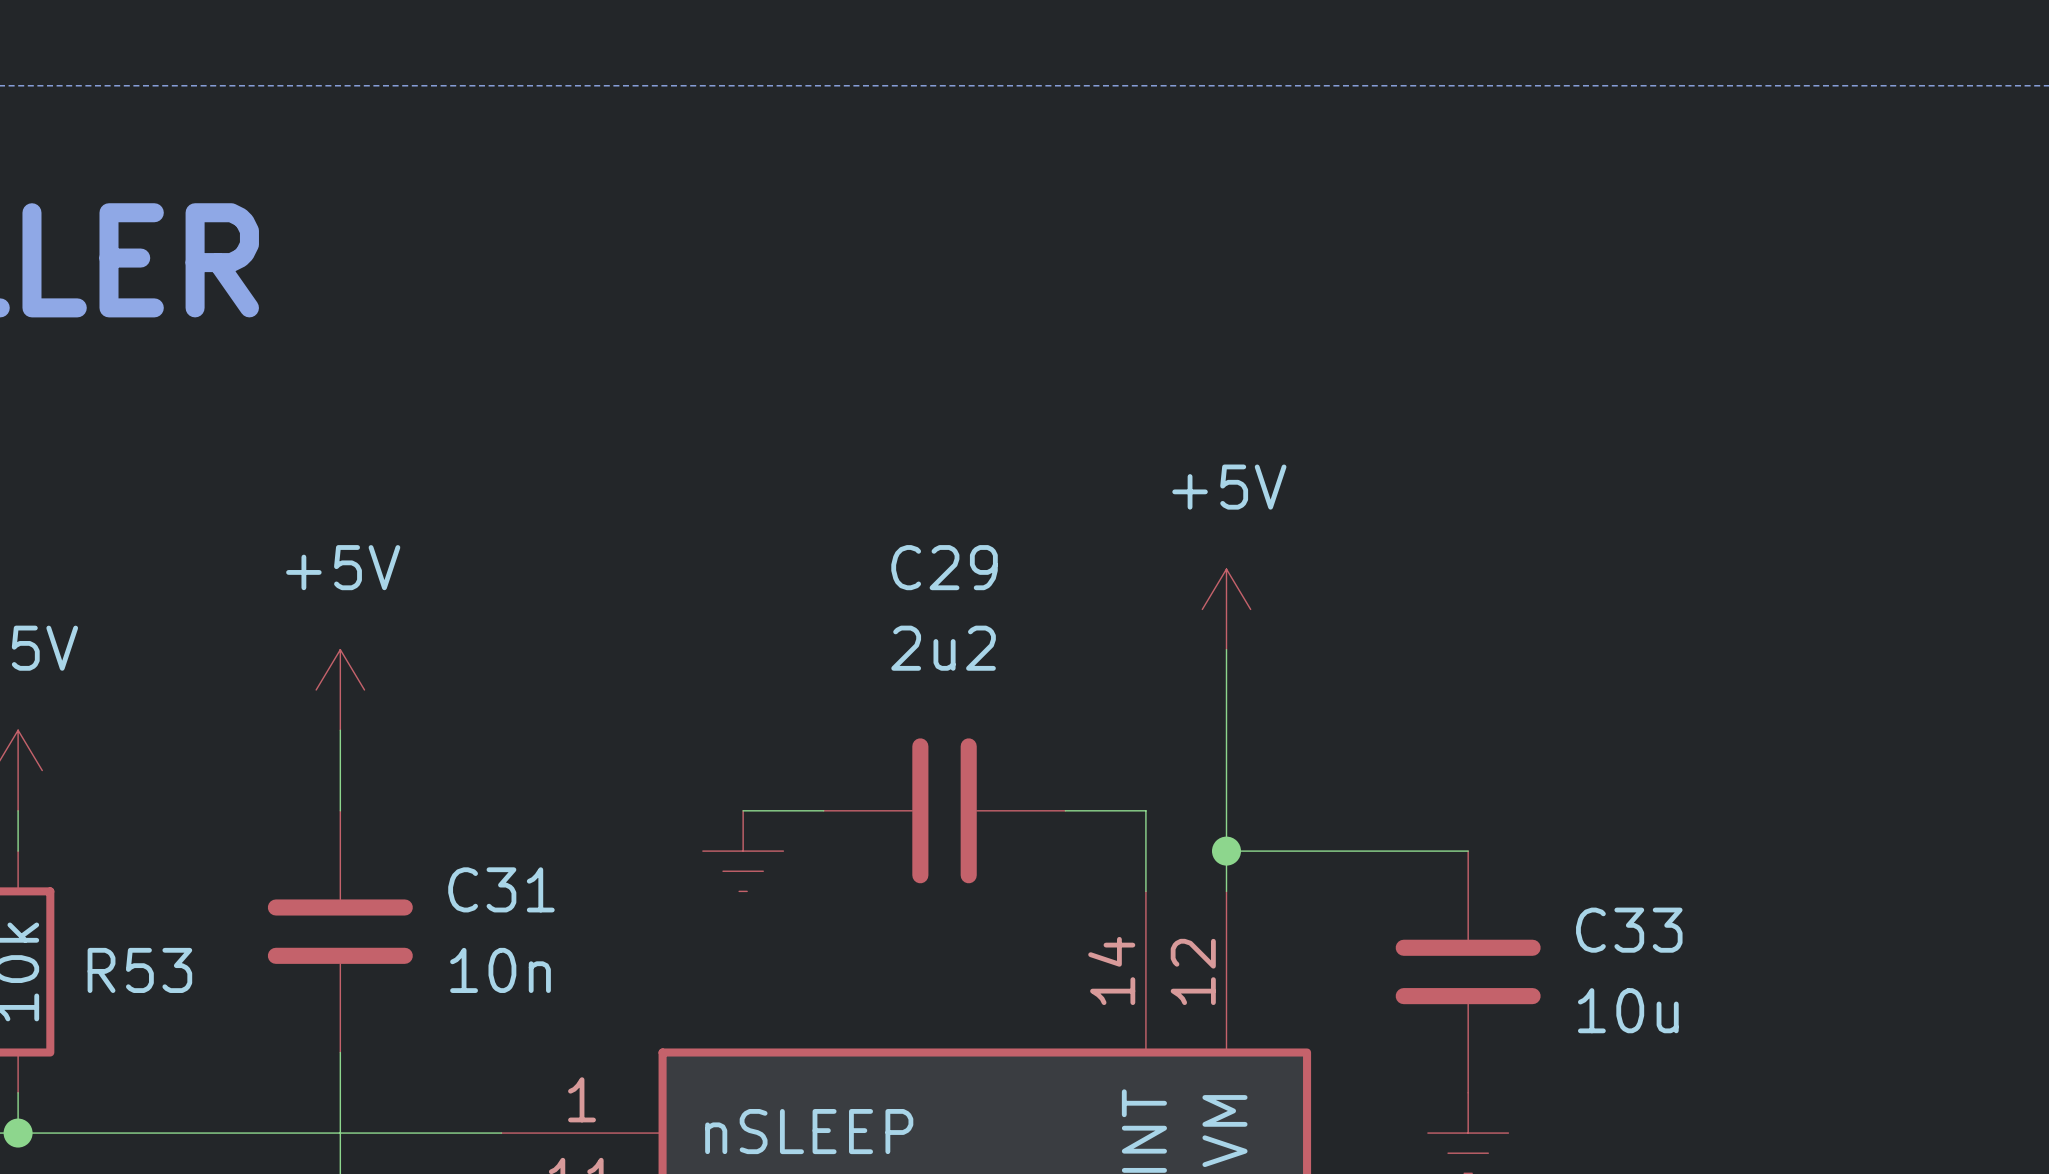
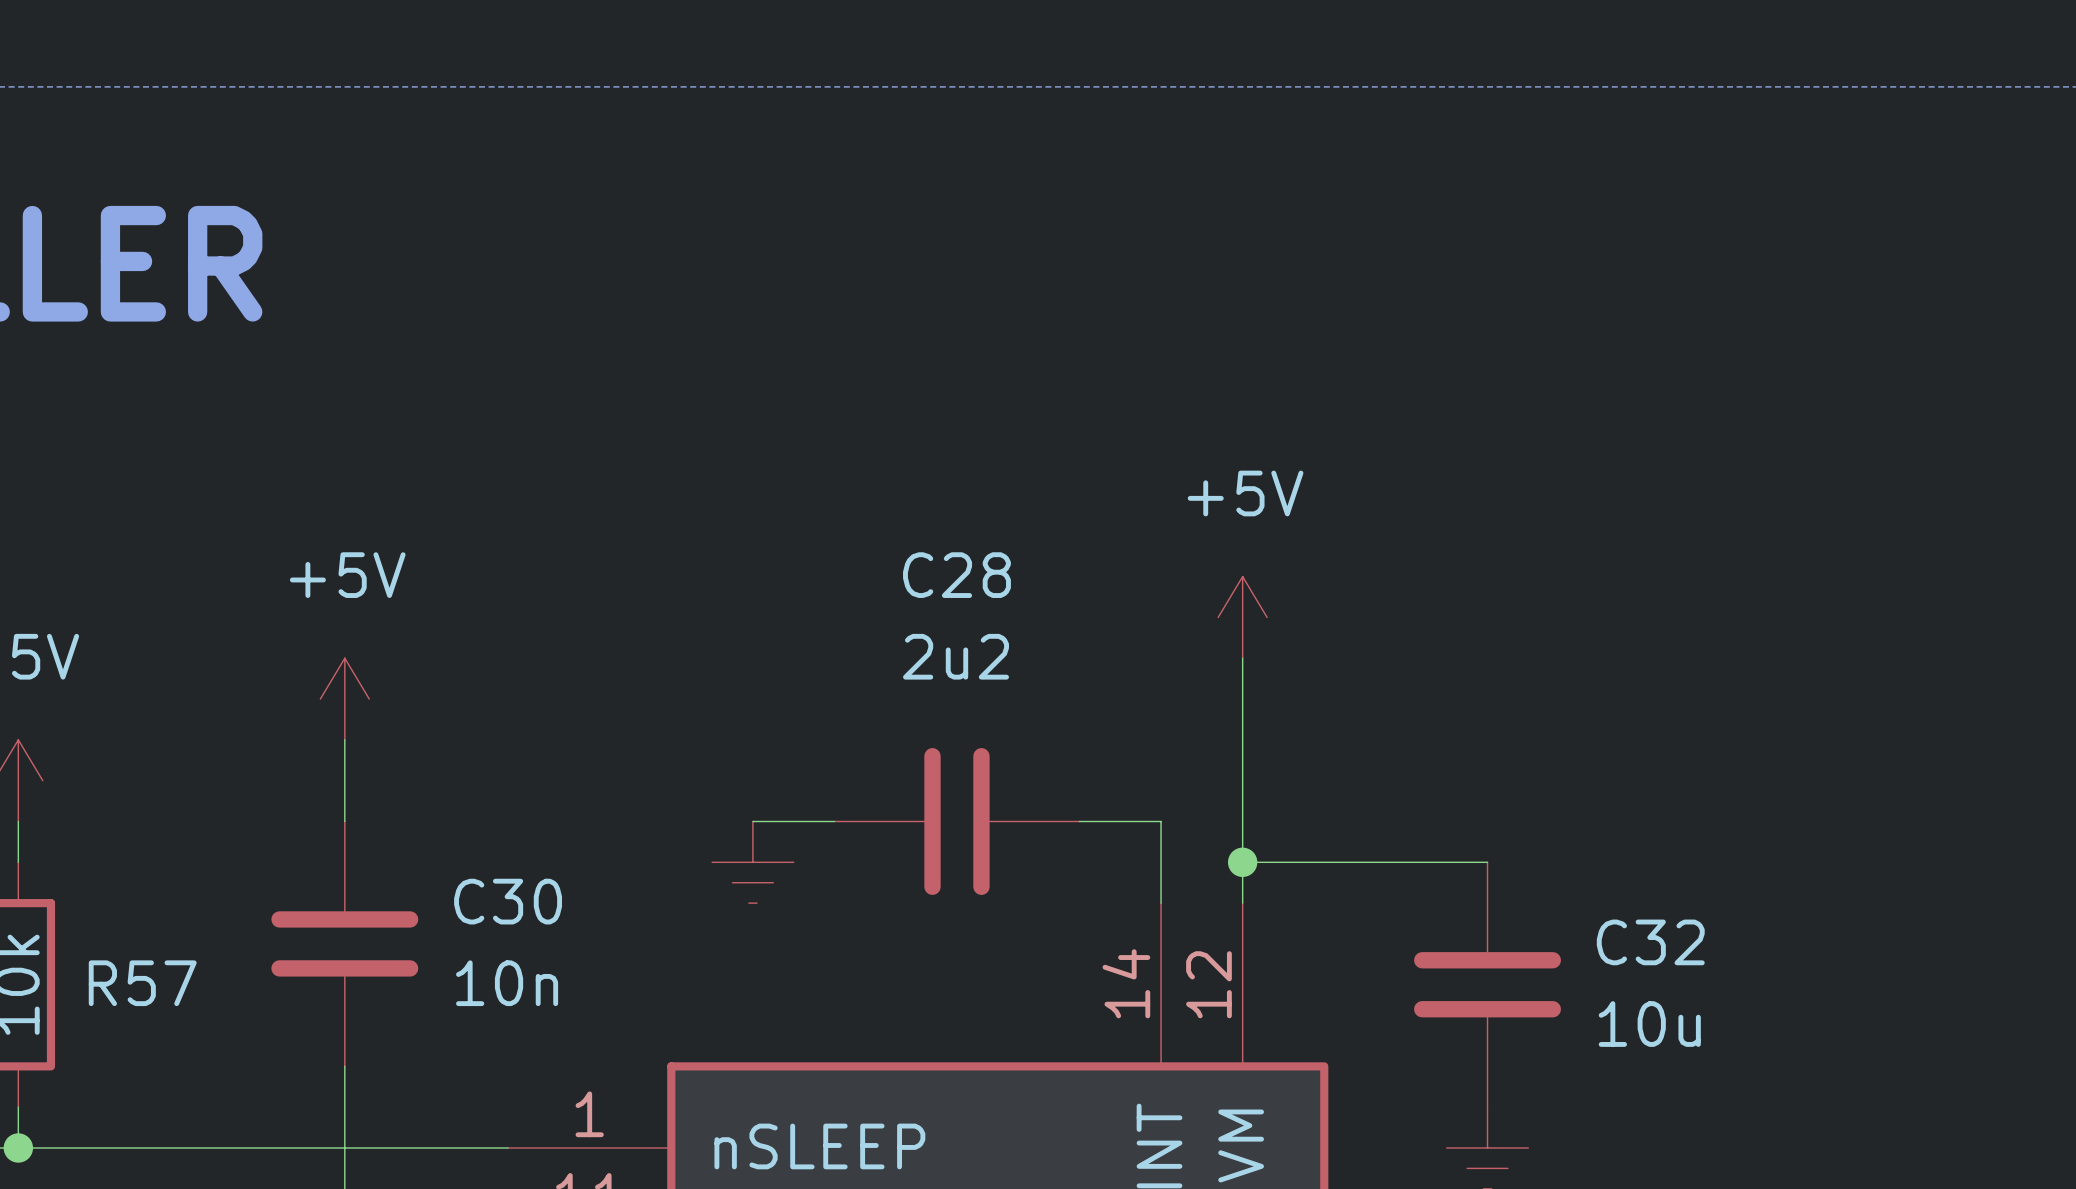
C29 name: C29 (944, 567) -> C28 (956, 575)
C31 name: C31 (501, 889) -> C30 (508, 901)
C33 name: C33 (1629, 930) -> C32 (1650, 942)
R53 name: R53 (139, 970) -> R57 (142, 983)

